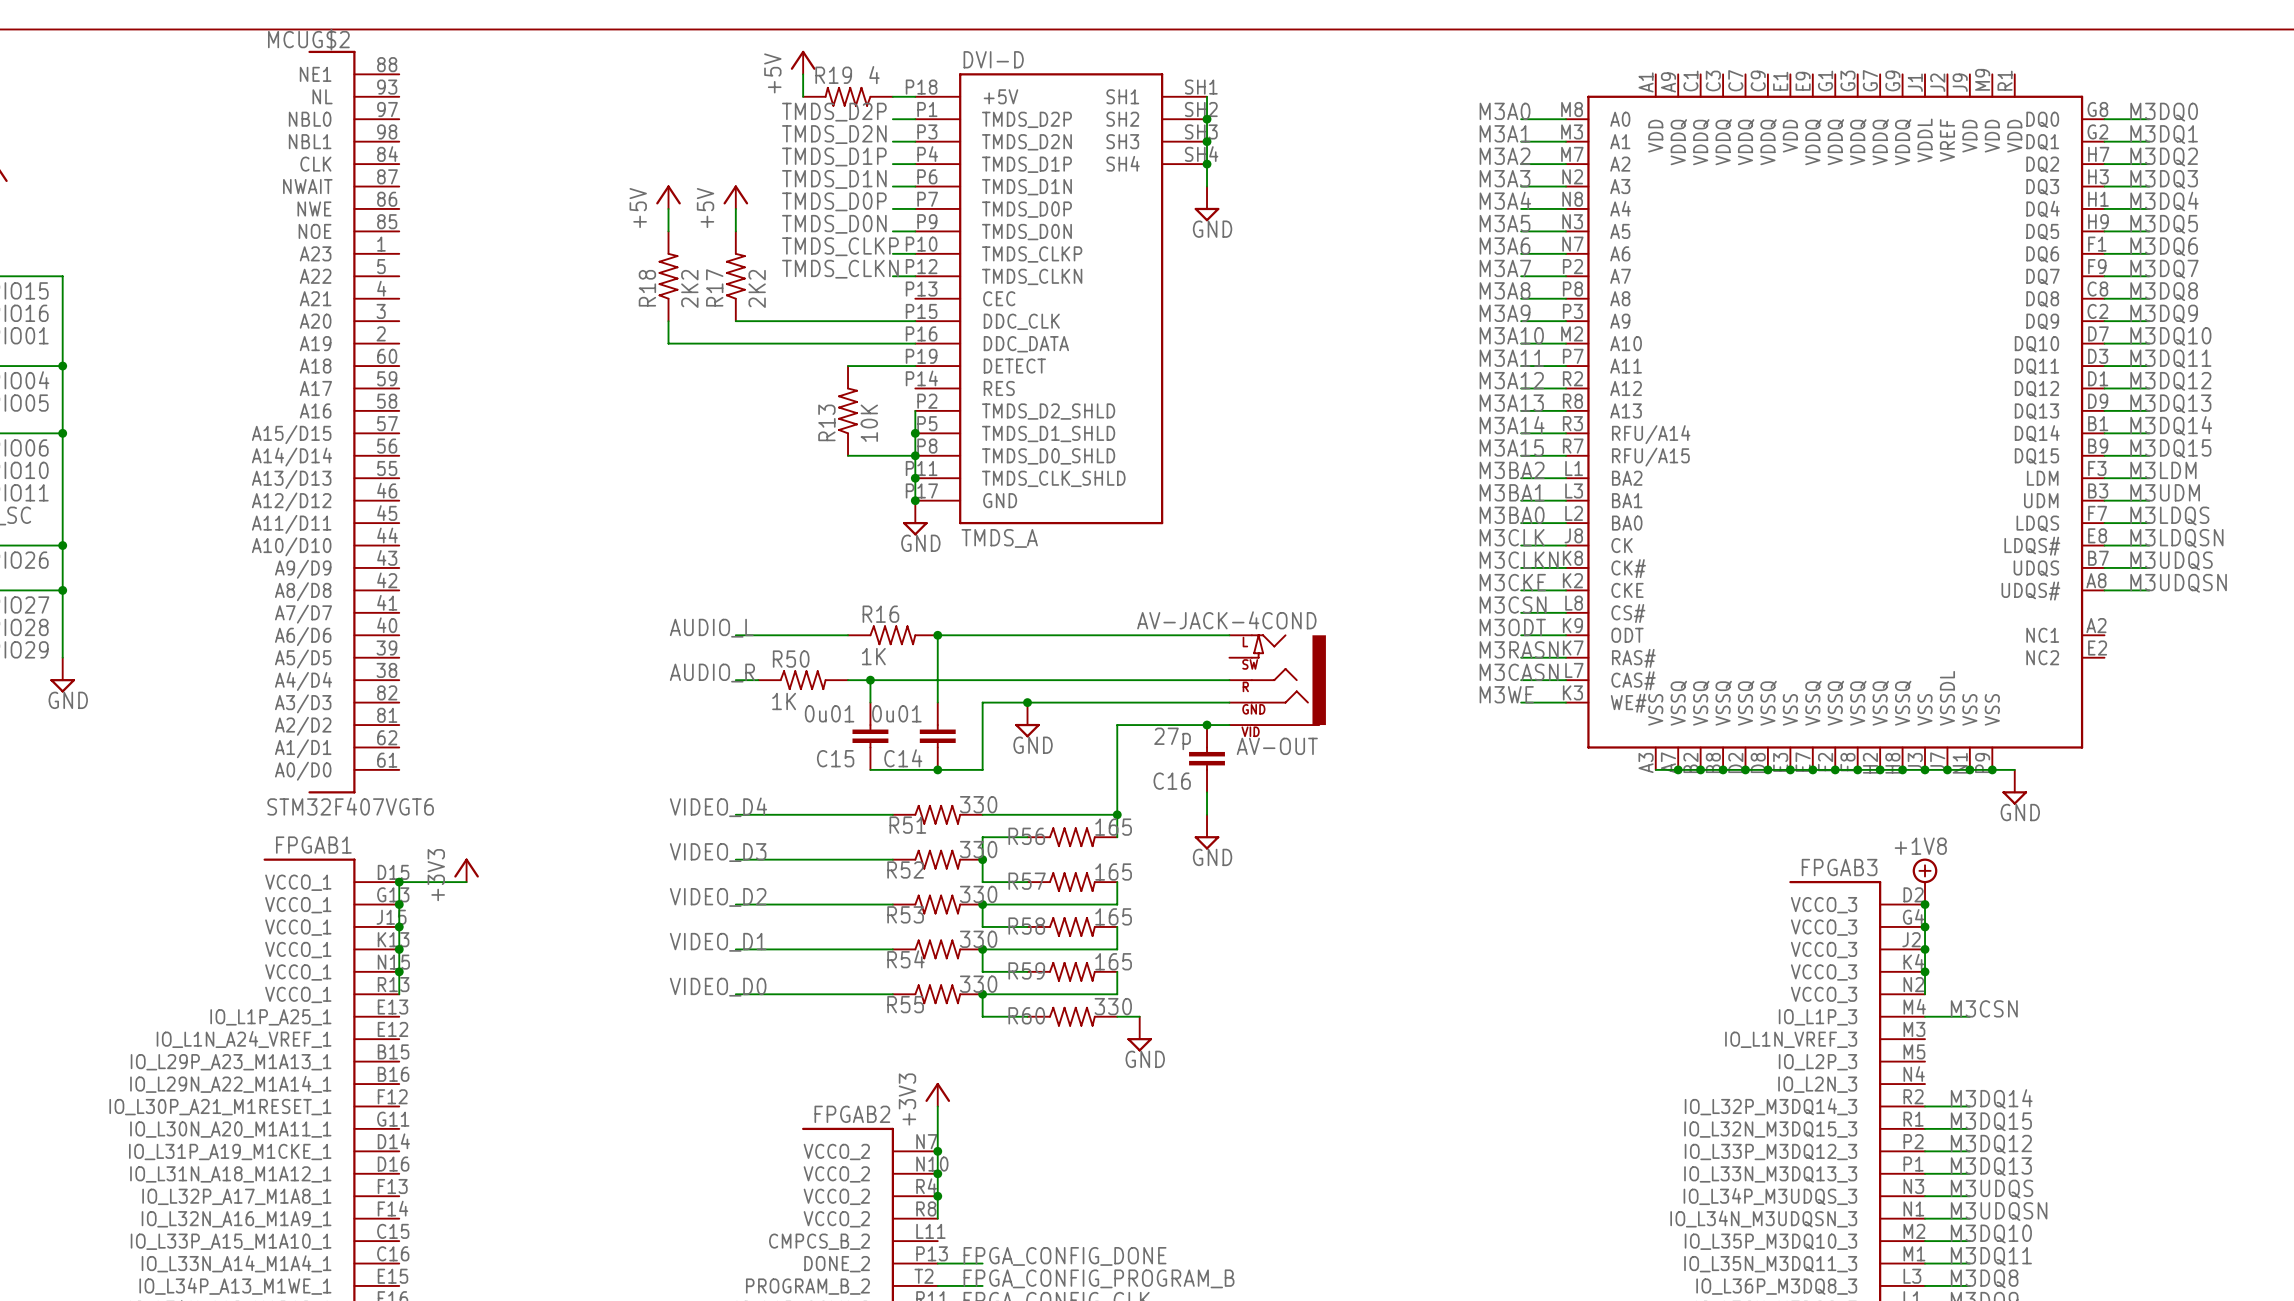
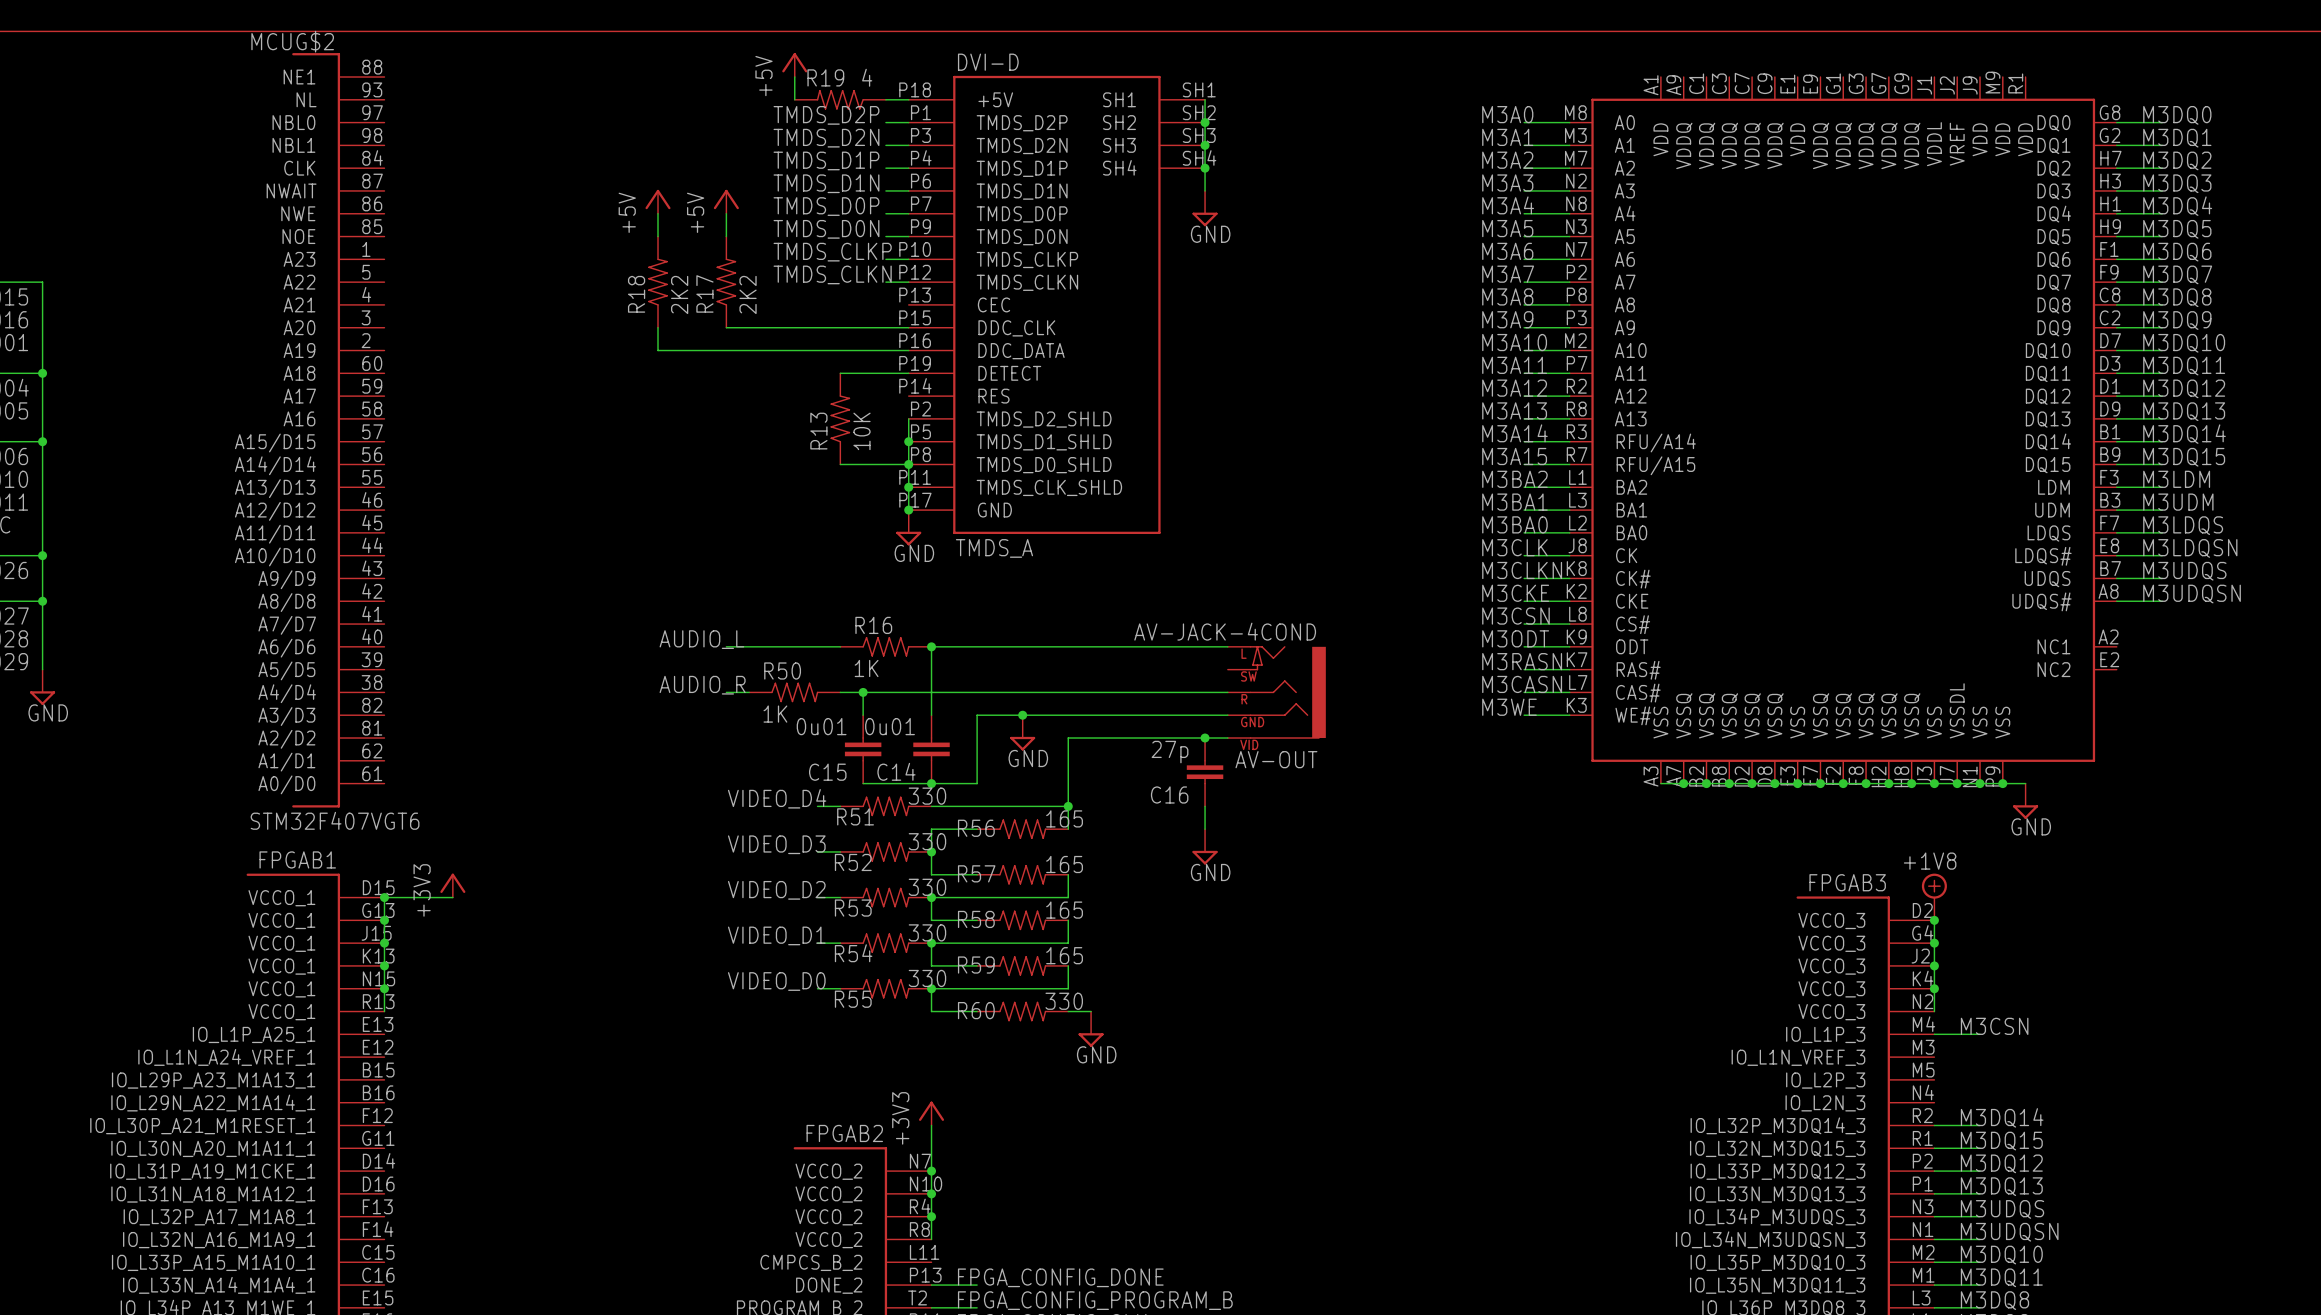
wire: (1117, 725) (1117, 837) -> (1113, 738) (1068, 738) (1068, 829)
wire: none -> (817, 806) (840, 806)
wire: none -> (931, 806) (1068, 806)
label position: VIDEO_D4 (718, 807) -> VIDEO_D4 (777, 798)
wire: (735, 814) (892, 814) -> none
R51 position: (937, 814) -> (885, 806)
wire: (982, 814) (1117, 814) -> (977, 829) (931, 829) (931, 874) (977, 874)
junction position: (1117, 814) -> (1068, 806)
wire: none -> (817, 851) (840, 851)
junction: none -> (931, 851)
wire: (1027, 837) (982, 837) (982, 882) -> (977, 920) (931, 920) (931, 897) (977, 897)
R56 position: (1072, 837) -> (1022, 829)
label position: VIDEO_D3 (718, 852) -> VIDEO_D3 (776, 844)
wire: (735, 859) (892, 859) -> none
R52 position: (937, 859) -> (885, 851)
junction: (982, 859) -> none
wire: none -> (1068, 874) (1068, 897) (1022, 897)
wire: none -> (817, 897) (840, 897)
junction: none -> (931, 897)
R57 position: (1072, 882) -> (1022, 874)
wire: (1117, 882) (1117, 904) (982, 904) (982, 926) -> (977, 965) (931, 965) (931, 943) (977, 943)
label position: VIDEO_D2 (718, 897) -> VIDEO_D2 (776, 890)
wire: (735, 904) (892, 904) -> none
R53 position: (937, 904) -> (885, 897)
junction: (982, 904) -> none
wire: none -> (1068, 920) (1068, 943) (1022, 943)
wire: none -> (817, 943) (840, 943)
junction: none -> (931, 943)
R58 position: (1072, 926) -> (1022, 920)
wire: (1117, 926) (1117, 949) (982, 949) (982, 971) -> (977, 1011) (931, 1011) (931, 988) (977, 988)
label position: VIDEO_D1 (718, 942) -> VIDEO_D1 (776, 935)
wire: (735, 949) (892, 949) -> none
R54 position: (937, 949) -> (885, 943)
junction: (982, 949) -> none
wire: none -> (1068, 965) (1068, 988) (1022, 988)
wire: none -> (817, 988) (840, 988)
junction: none -> (931, 988)
R59 position: (1072, 971) -> (1022, 965)
wire: (1117, 971) (1117, 994) (1094, 994) -> none
label position: VIDEO_D0 (718, 987) -> VIDEO_D0 (776, 981)
wire: (735, 994) (892, 994) -> none
R55 position: (937, 994) -> (885, 988)
junction: (982, 994) -> none
wire: (1072, 994) (982, 994) (982, 1016) (1027, 1016) -> none
R60 position: (1072, 1016) -> (1022, 1011)
wire: (1117, 1016) (1139, 1016) -> none
power symbol position: GND (1139, 1034) -> GND (1091, 1029)

